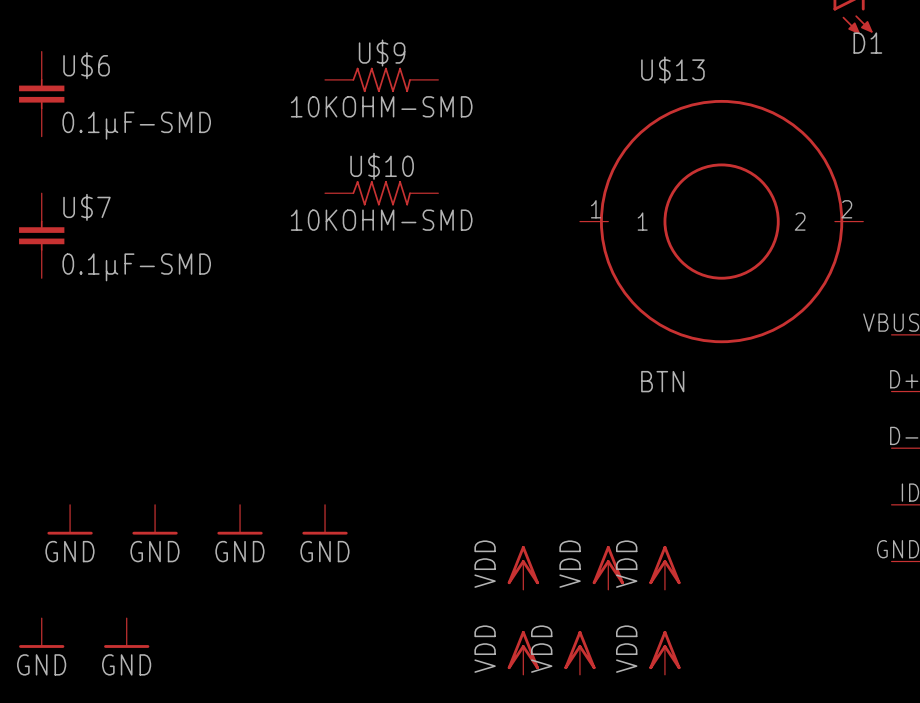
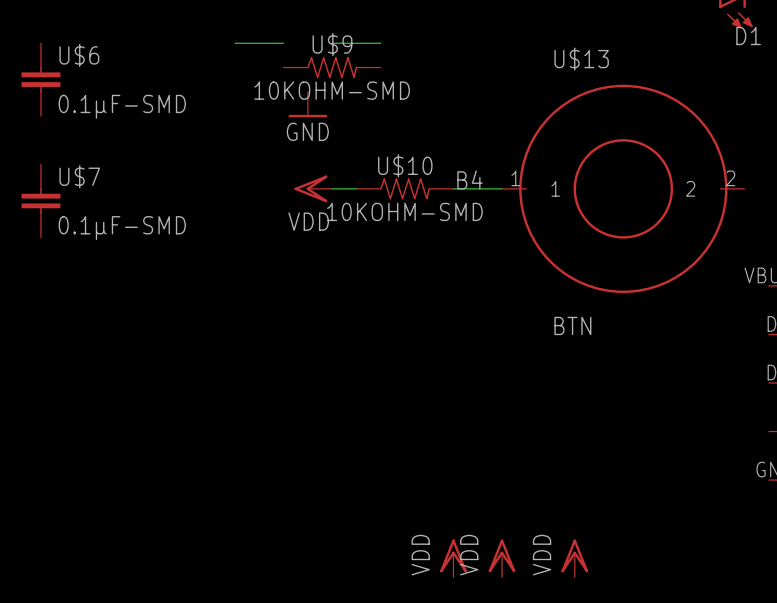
wire: none -> (235, 43) (283, 43)
wire: none -> (332, 43) (380, 43)
power symbol: none -> GND (307, 104)
U$10 position: (381, 193) -> (404, 188)
label: none -> B4 (470, 179)
power symbol: none -> VDD (313, 188)
wire: none -> (332, 188) (356, 188)
wire: none -> (453, 188) (502, 188)
power symbol: GND (70, 519) -> none
power symbol: GND (155, 519) -> none
power symbol: GND (240, 519) -> none
power symbol: GND (325, 519) -> none
power symbol: VDD (523, 567) -> none
power symbol: VDD (608, 567) -> none
power symbol: VDD (664, 567) -> none
power symbol: GND (41, 633) -> none
power symbol: GND (126, 633) -> none

